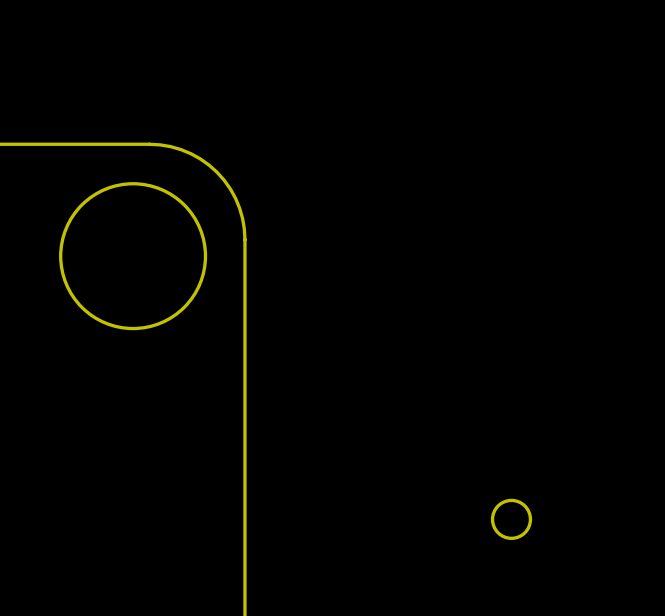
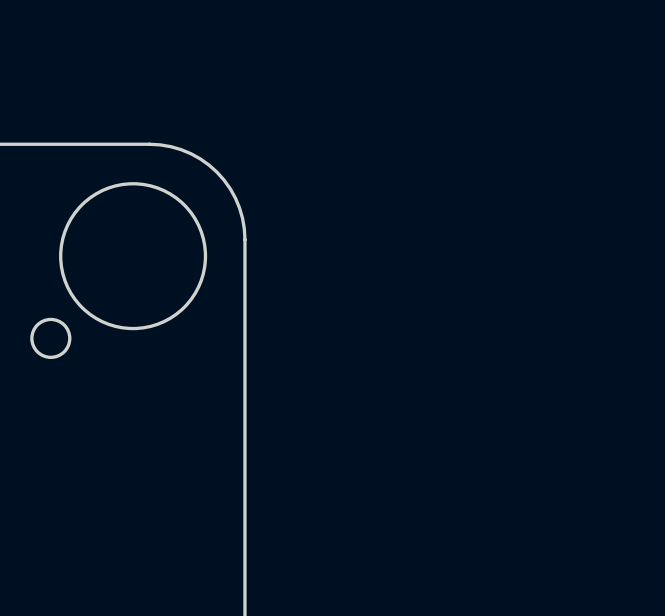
round board edge position: (511, 519) -> (50, 338)

